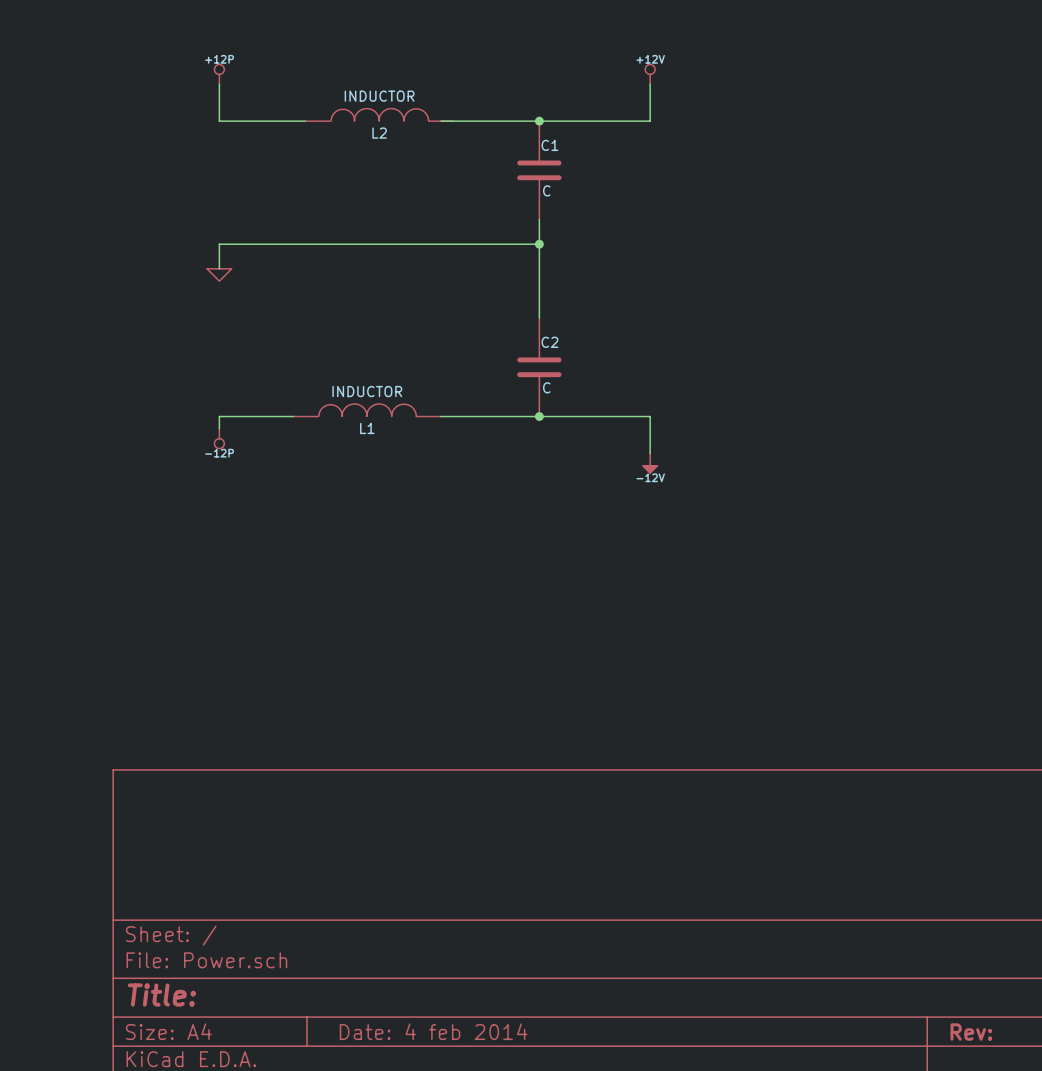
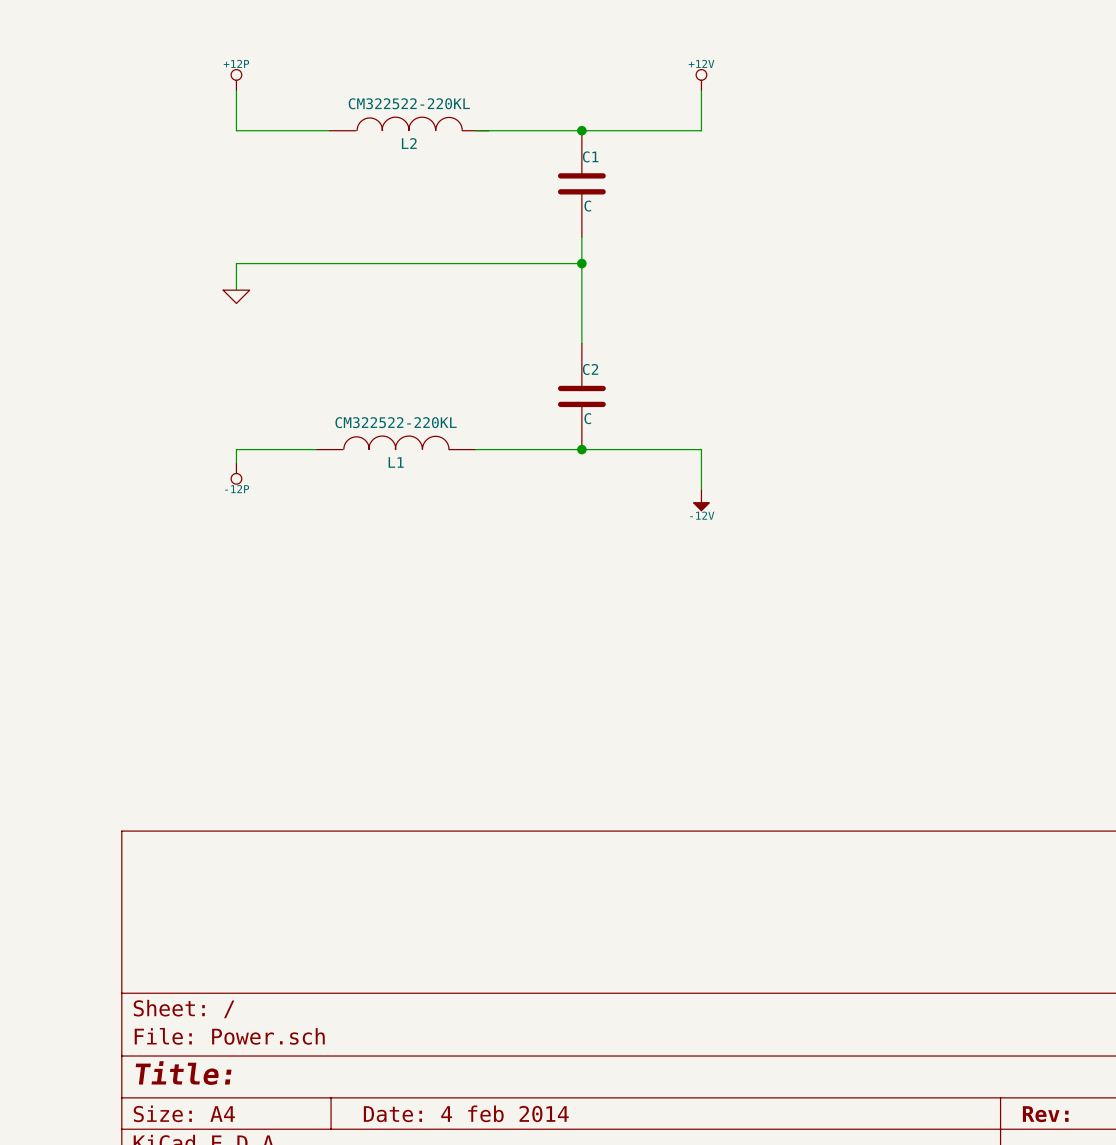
L2 value: INDUCTOR (379, 96) -> CM322522-220KL (409, 103)
L1 value: INDUCTOR (367, 391) -> CM322522-220KL (396, 422)

